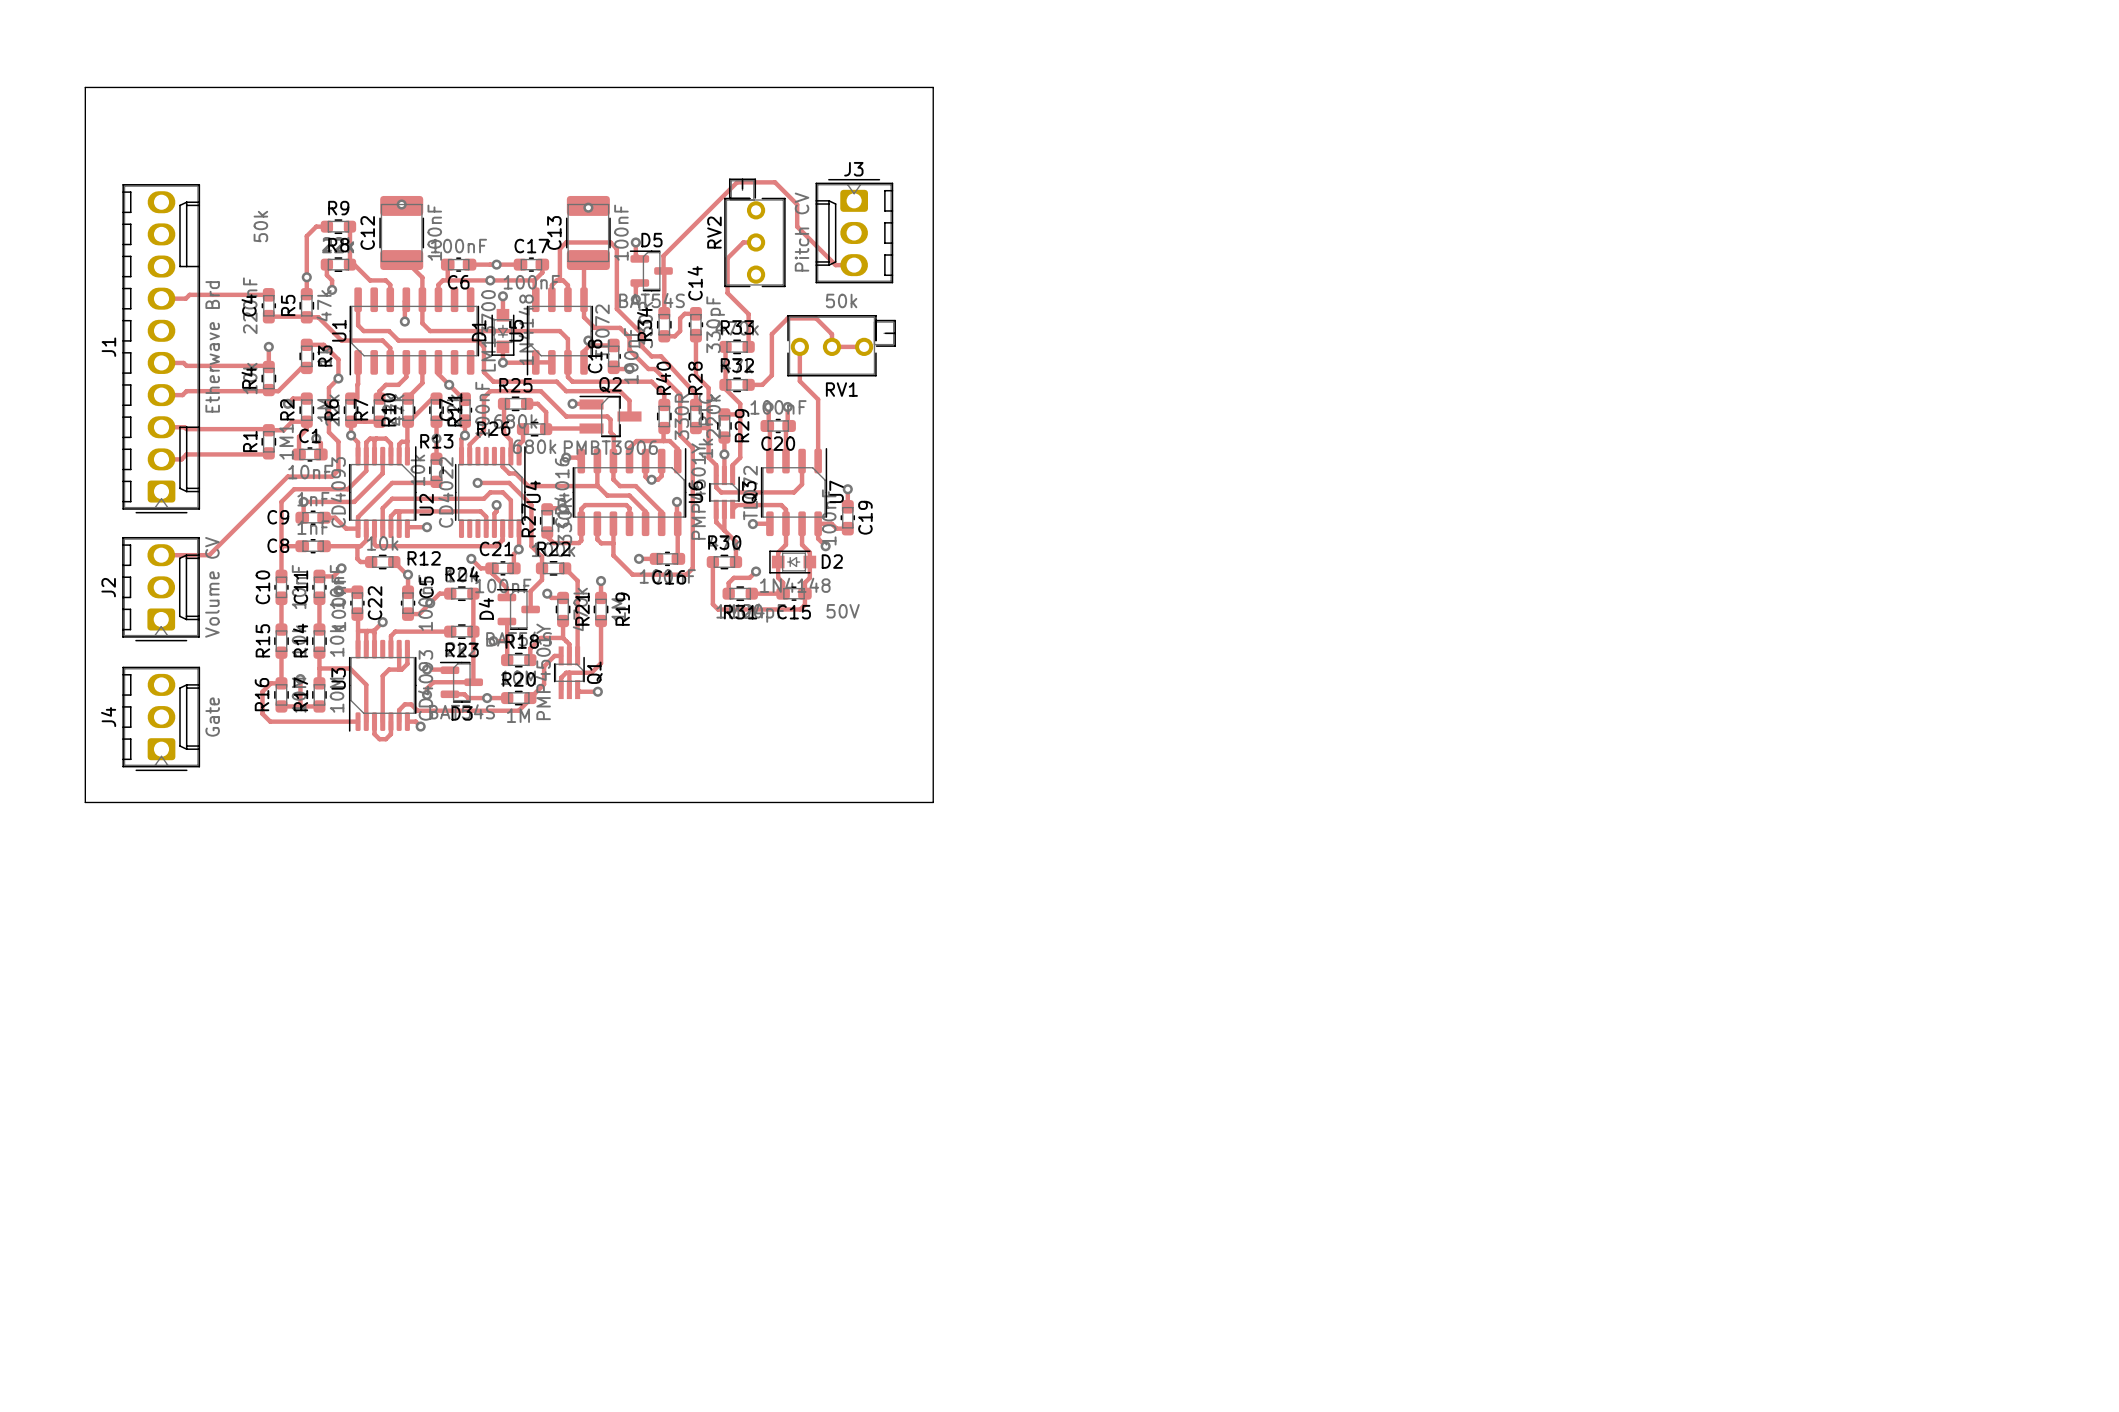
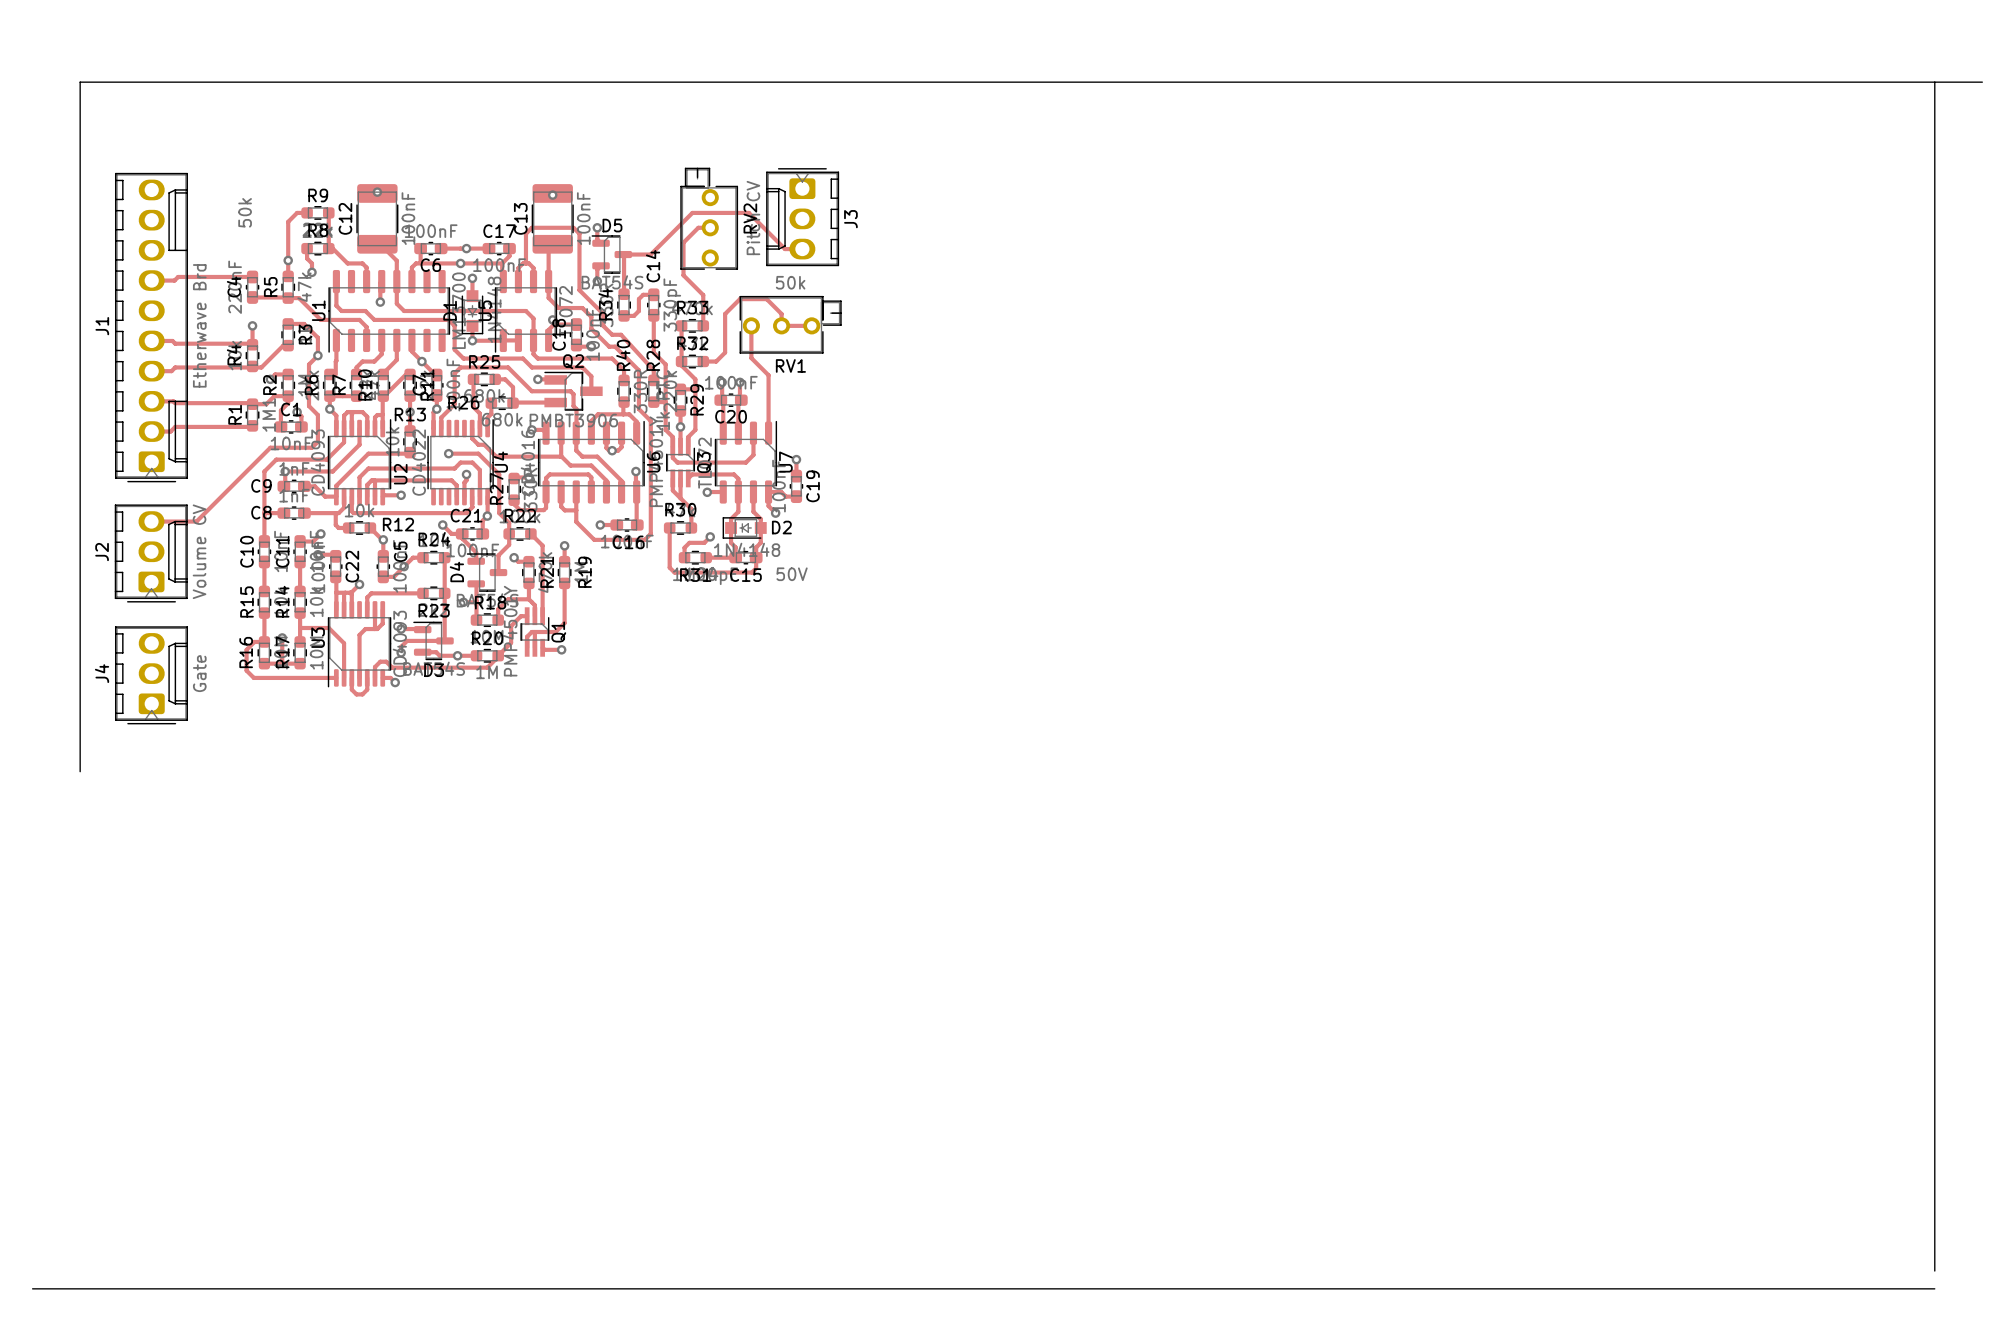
board edge: (933, 87) (933, 802) (85, 802) -> (80, 771) (80, 753)
board edge: none -> (876, 82) (1982, 82)
board edge: none -> (1934, 82) (1934, 1271)
J3 name rotation: 0° (853, 169) -> 90° counterclockwise (850, 219)
J3 name position: J3 (853, 169) -> J3 (850, 219)
track: (797, 226) (797, 204) (775, 182) (737, 182) (663, 255) (663, 270) -> (748, 212) (692, 212) (650, 254) (623, 254)
RV2 name position: RV2 (714, 232) -> RV2 (750, 218)
board edge: none -> (32, 1288) (1934, 1288)

